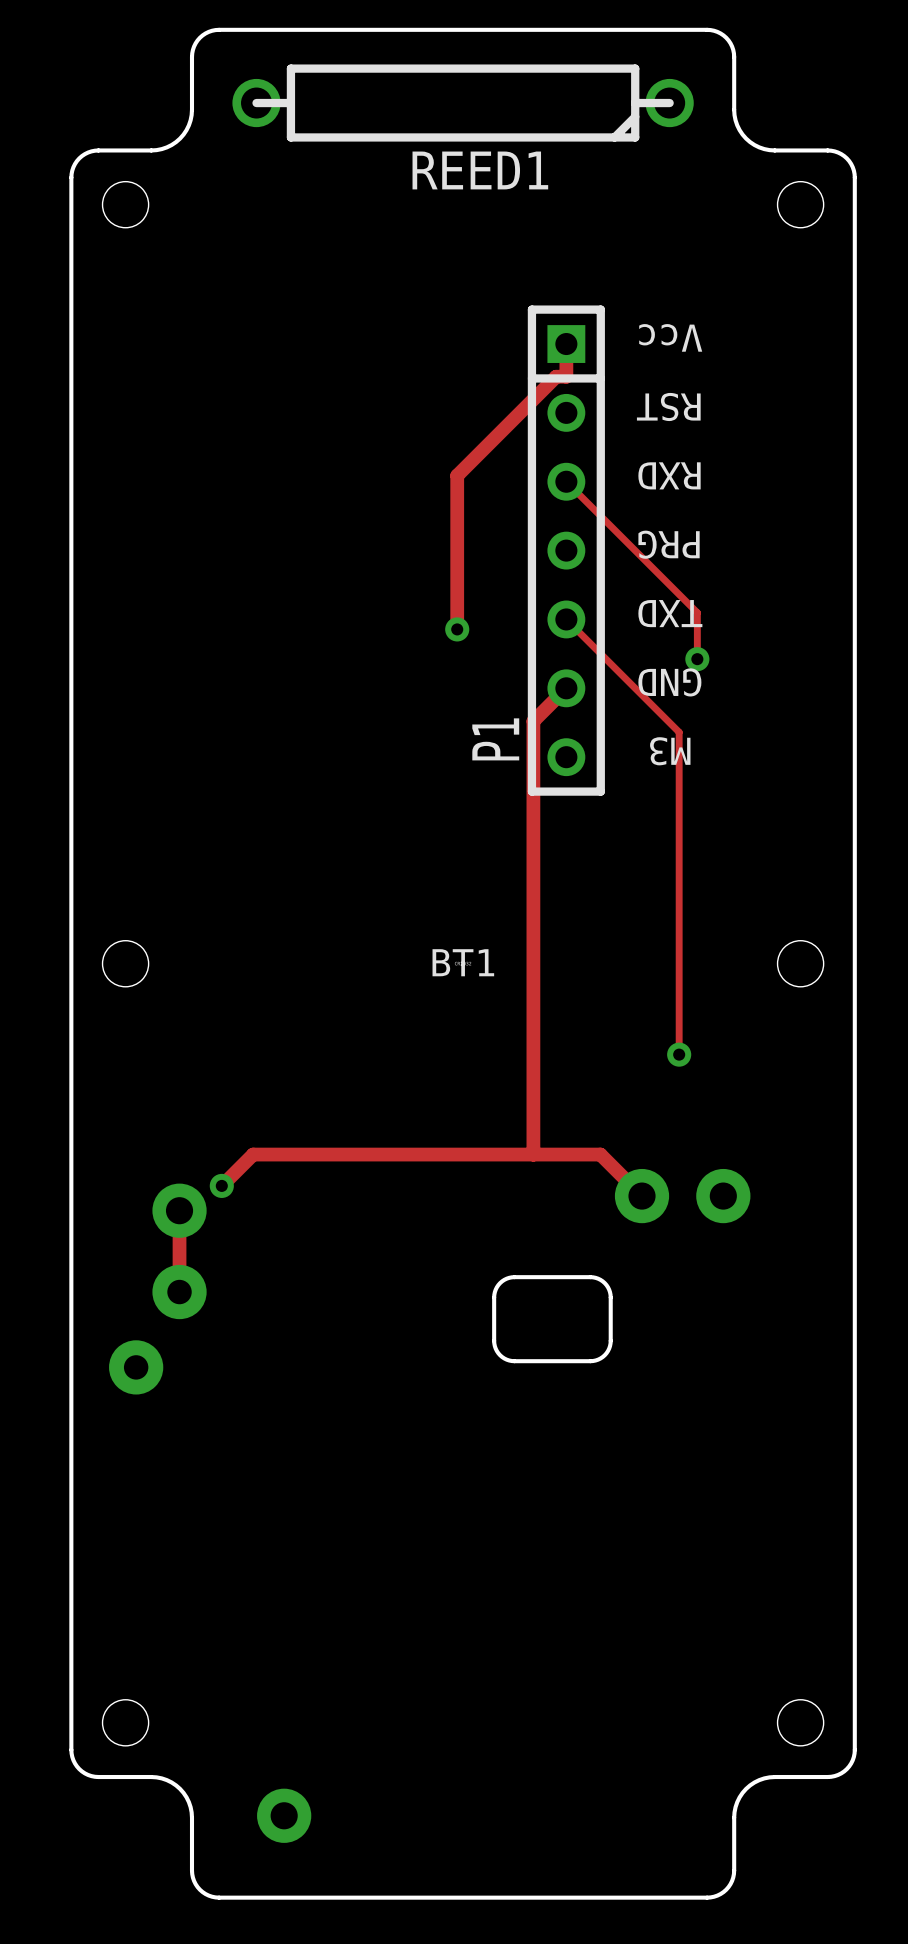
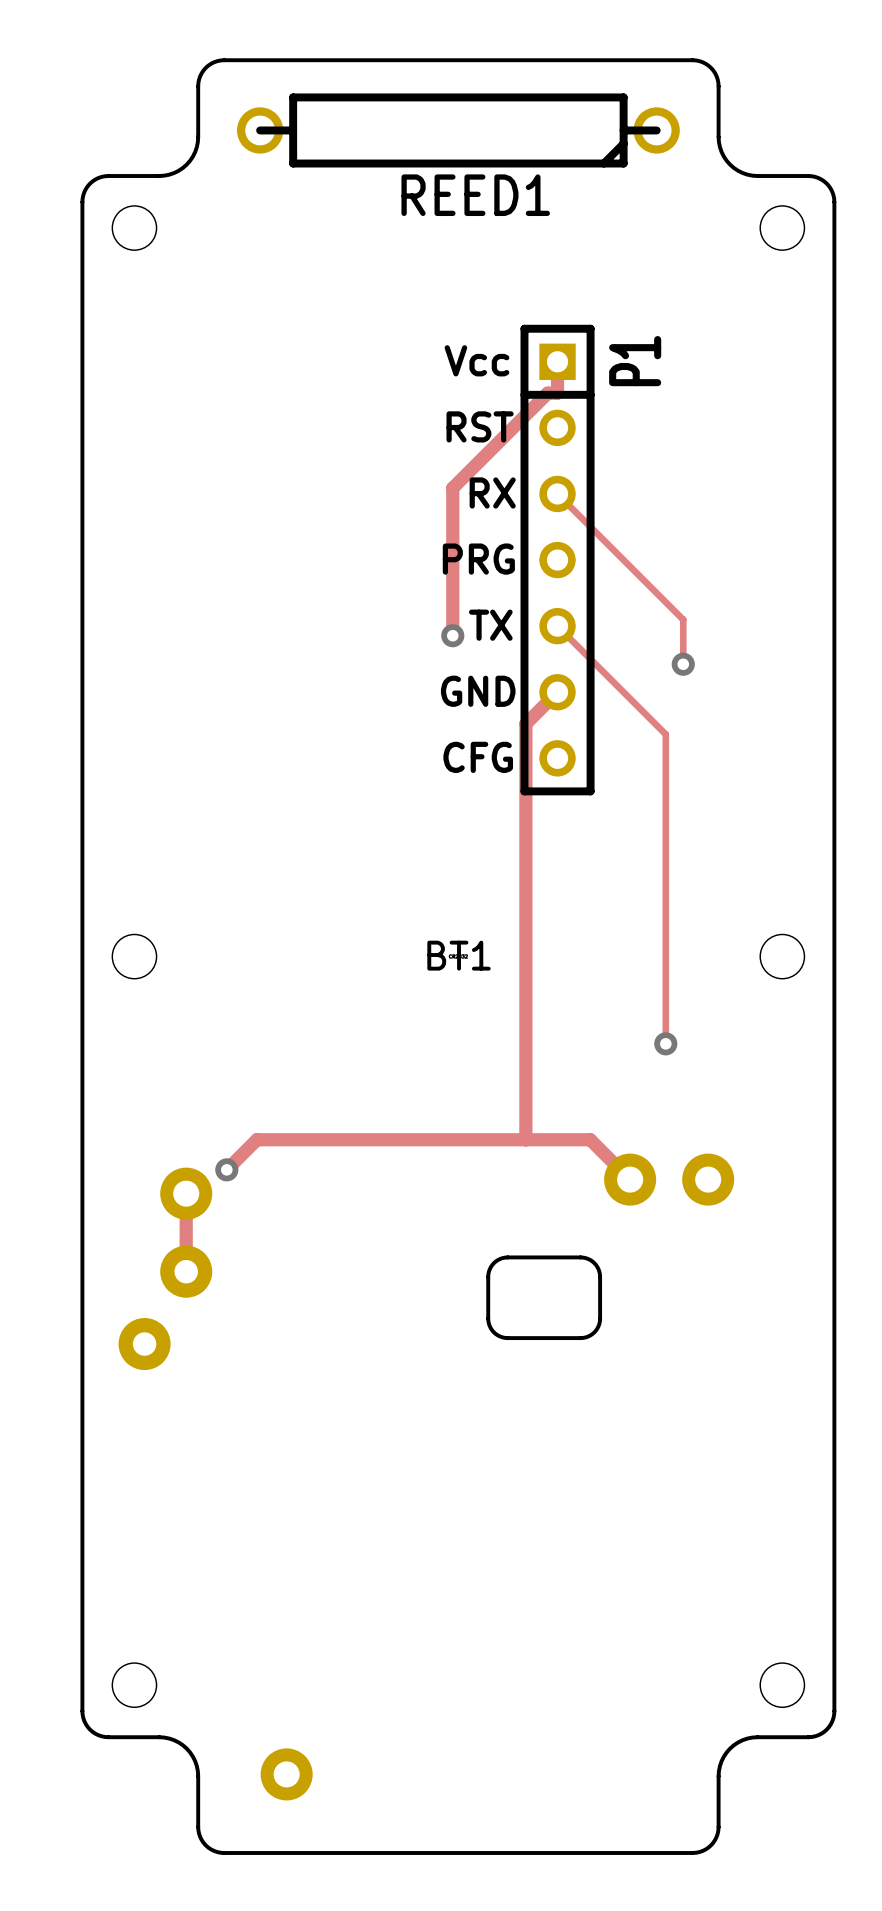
text rotation: 0° (670, 337) -> 180° (476, 360)
text position: Vcc (670, 337) -> Vcc (476, 360)
text rotation: 0° (668, 406) -> 180° (480, 426)
text position: RST (668, 406) -> RST (480, 426)
text: RXD (669, 475) -> none
text: none -> RX (492, 493)
text rotation: 0° (669, 544) -> 180° (478, 559)
text position: PRG (669, 544) -> PRG (478, 559)
text: TXD (670, 613) -> none
text: none -> TX (490, 625)
text rotation: 0° (669, 682) -> 180° (478, 691)
text position: GND (669, 682) -> GND (478, 691)
P1 name position: P1 (495, 739) -> P1 (635, 361)
text: M3 (670, 751) -> none
text: none -> CFG (478, 757)

